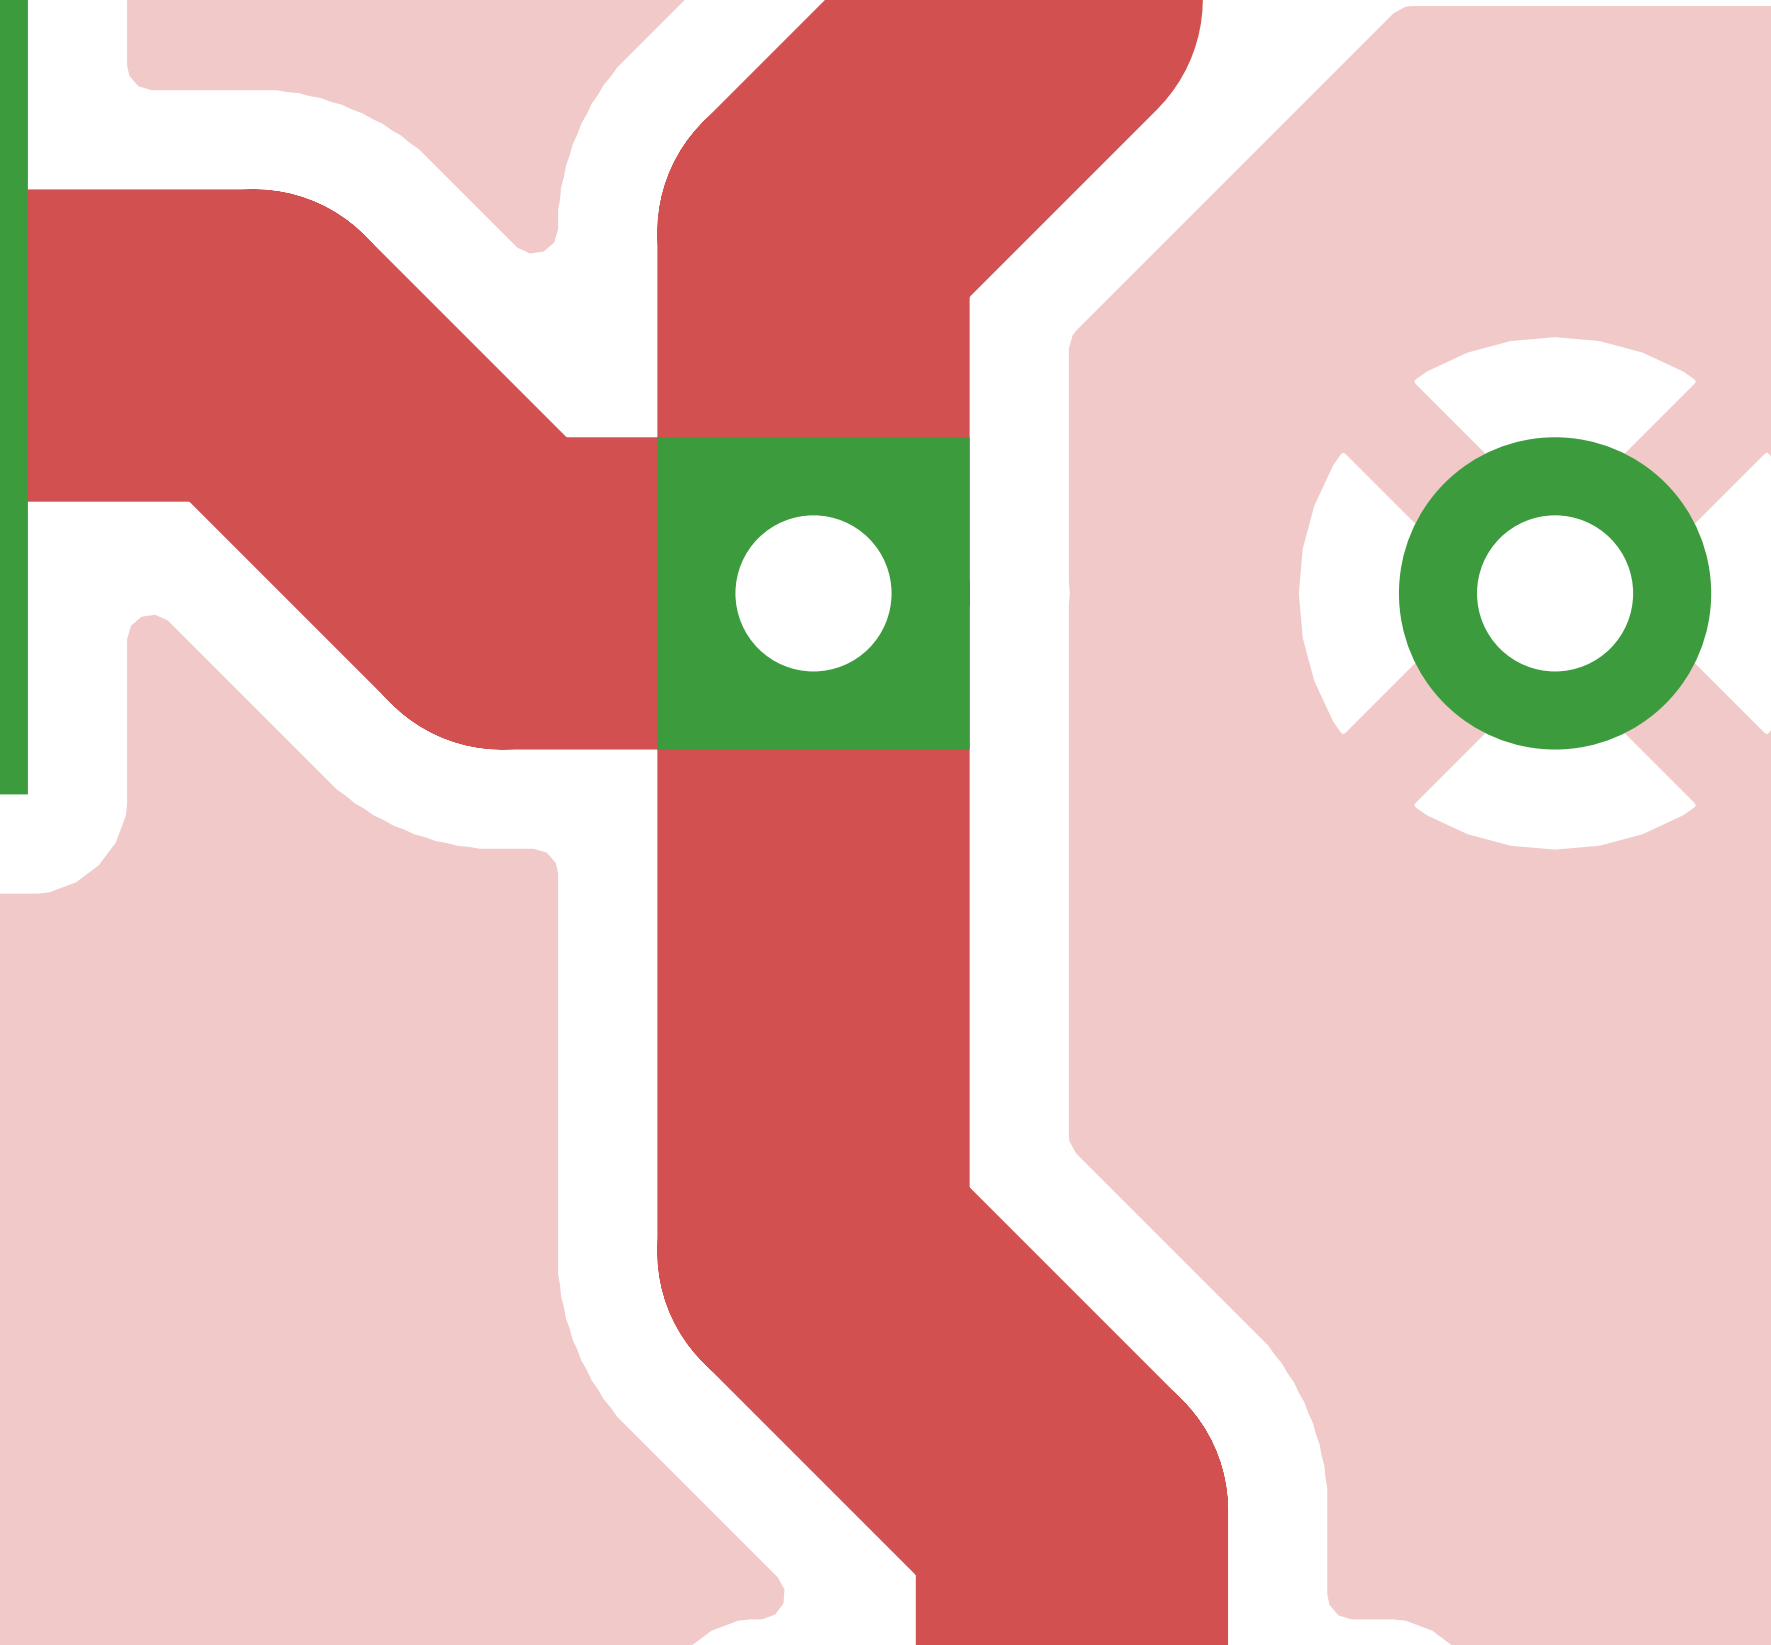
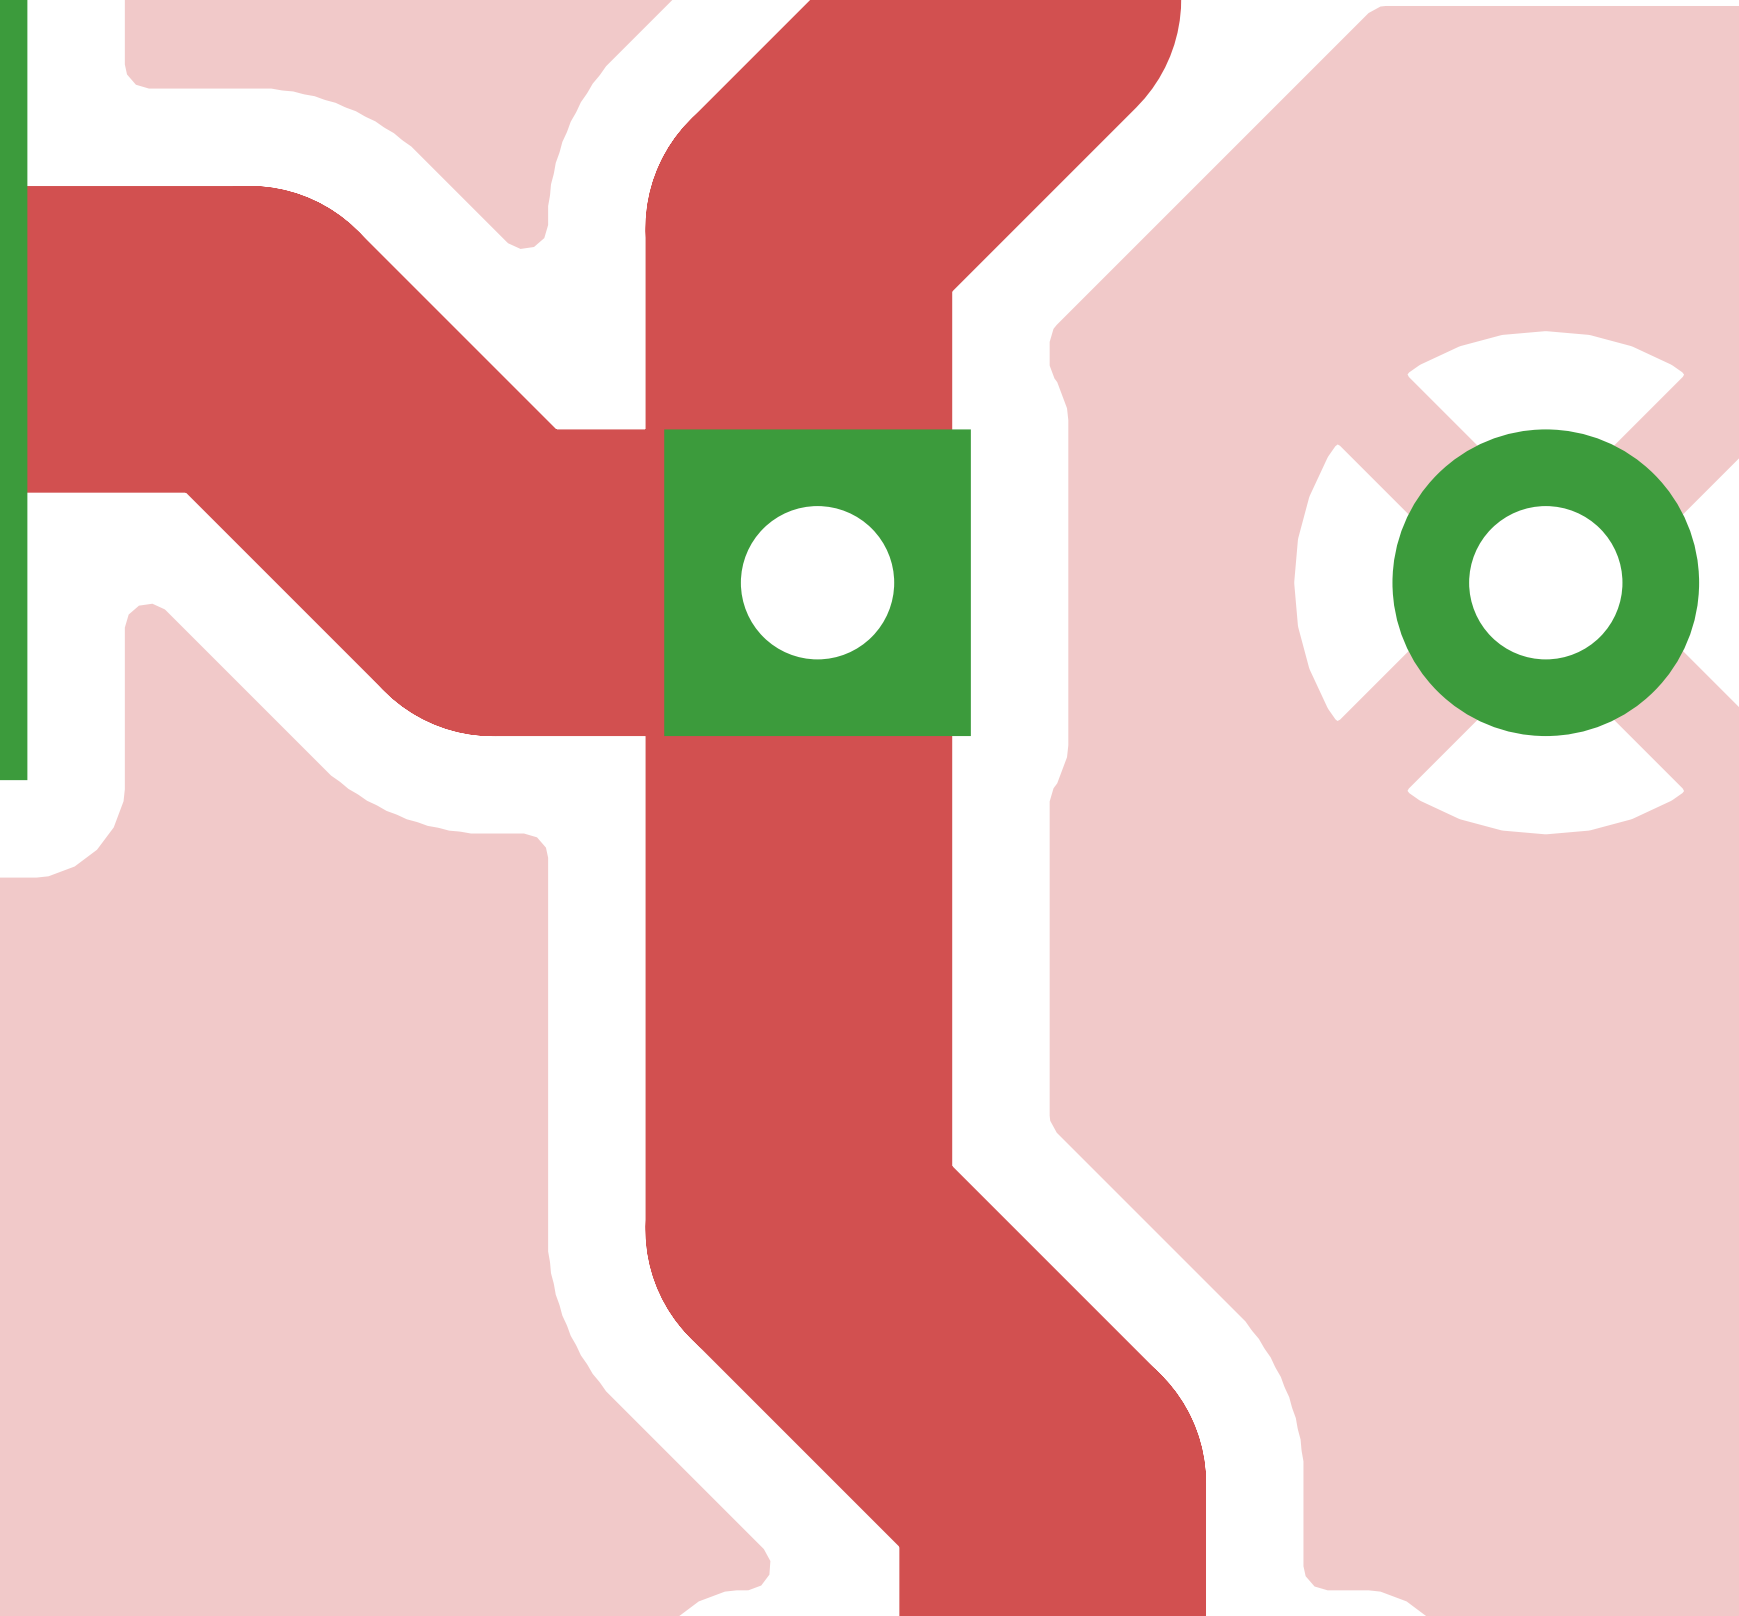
part position: (1184, 593) -> (1181, 582)

